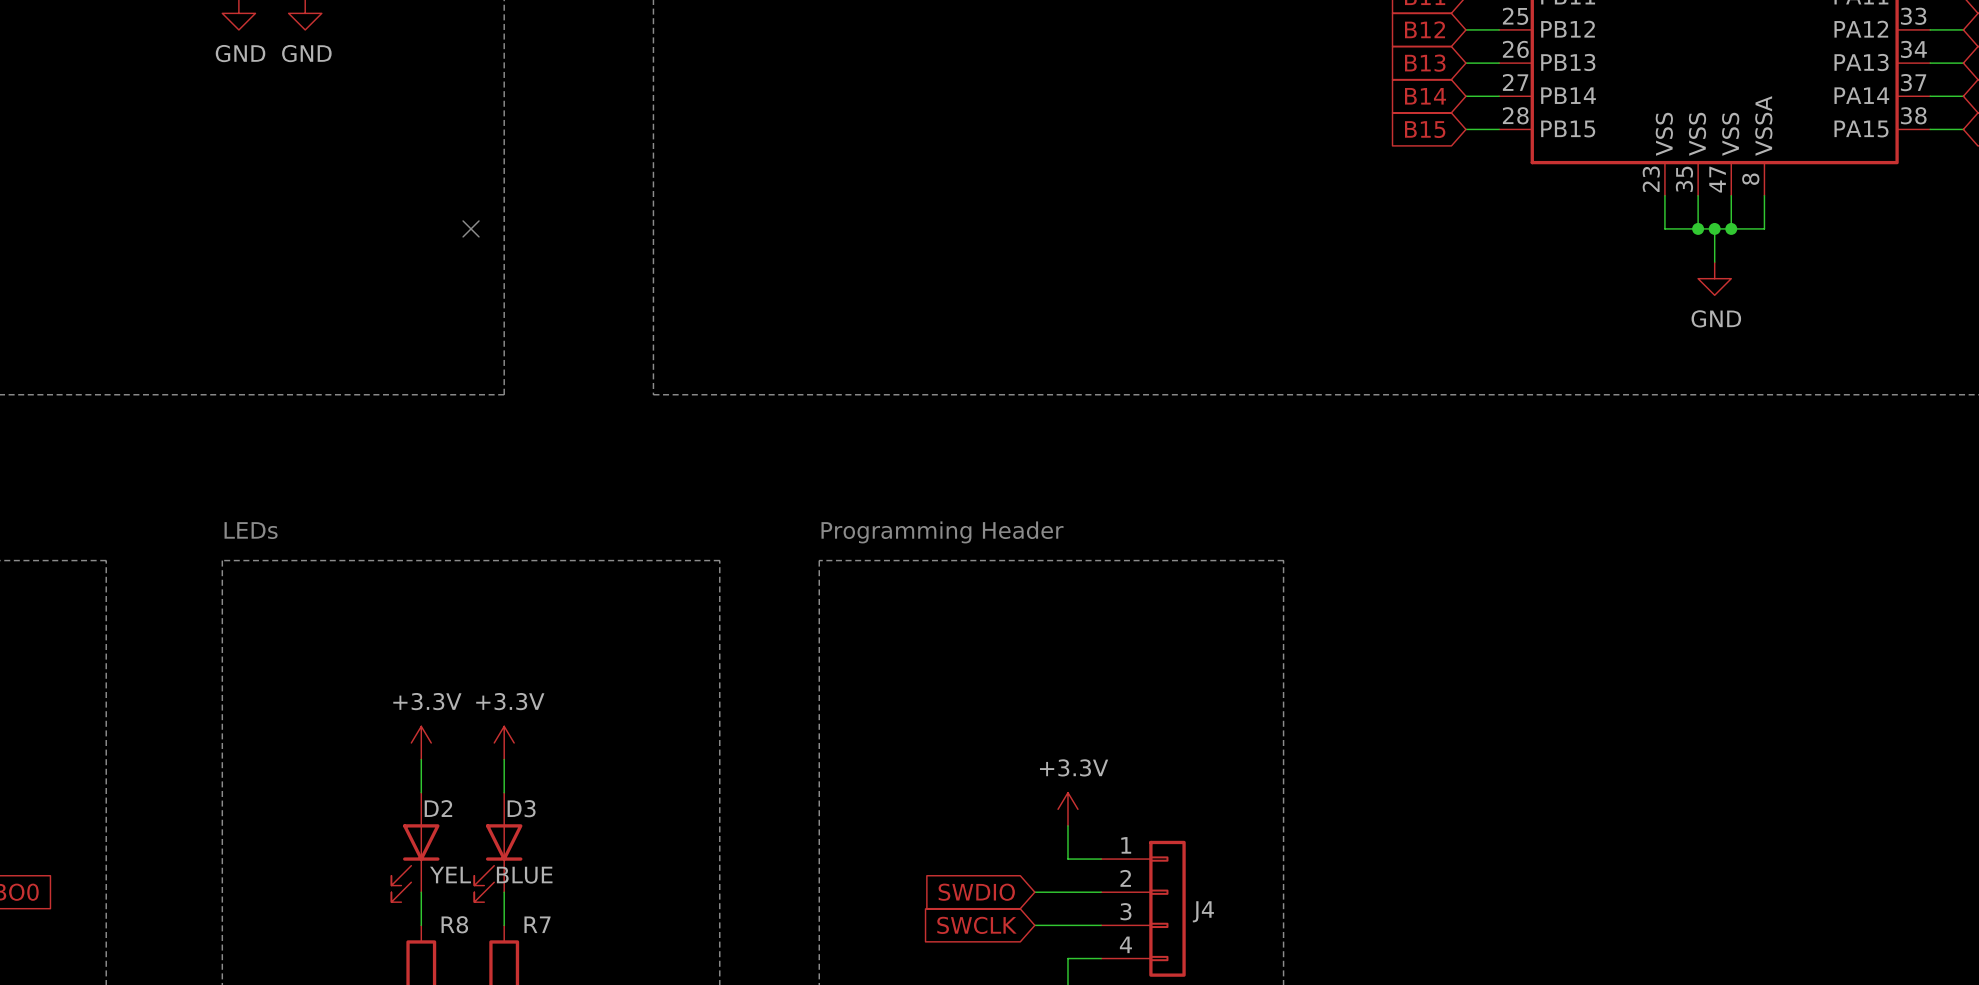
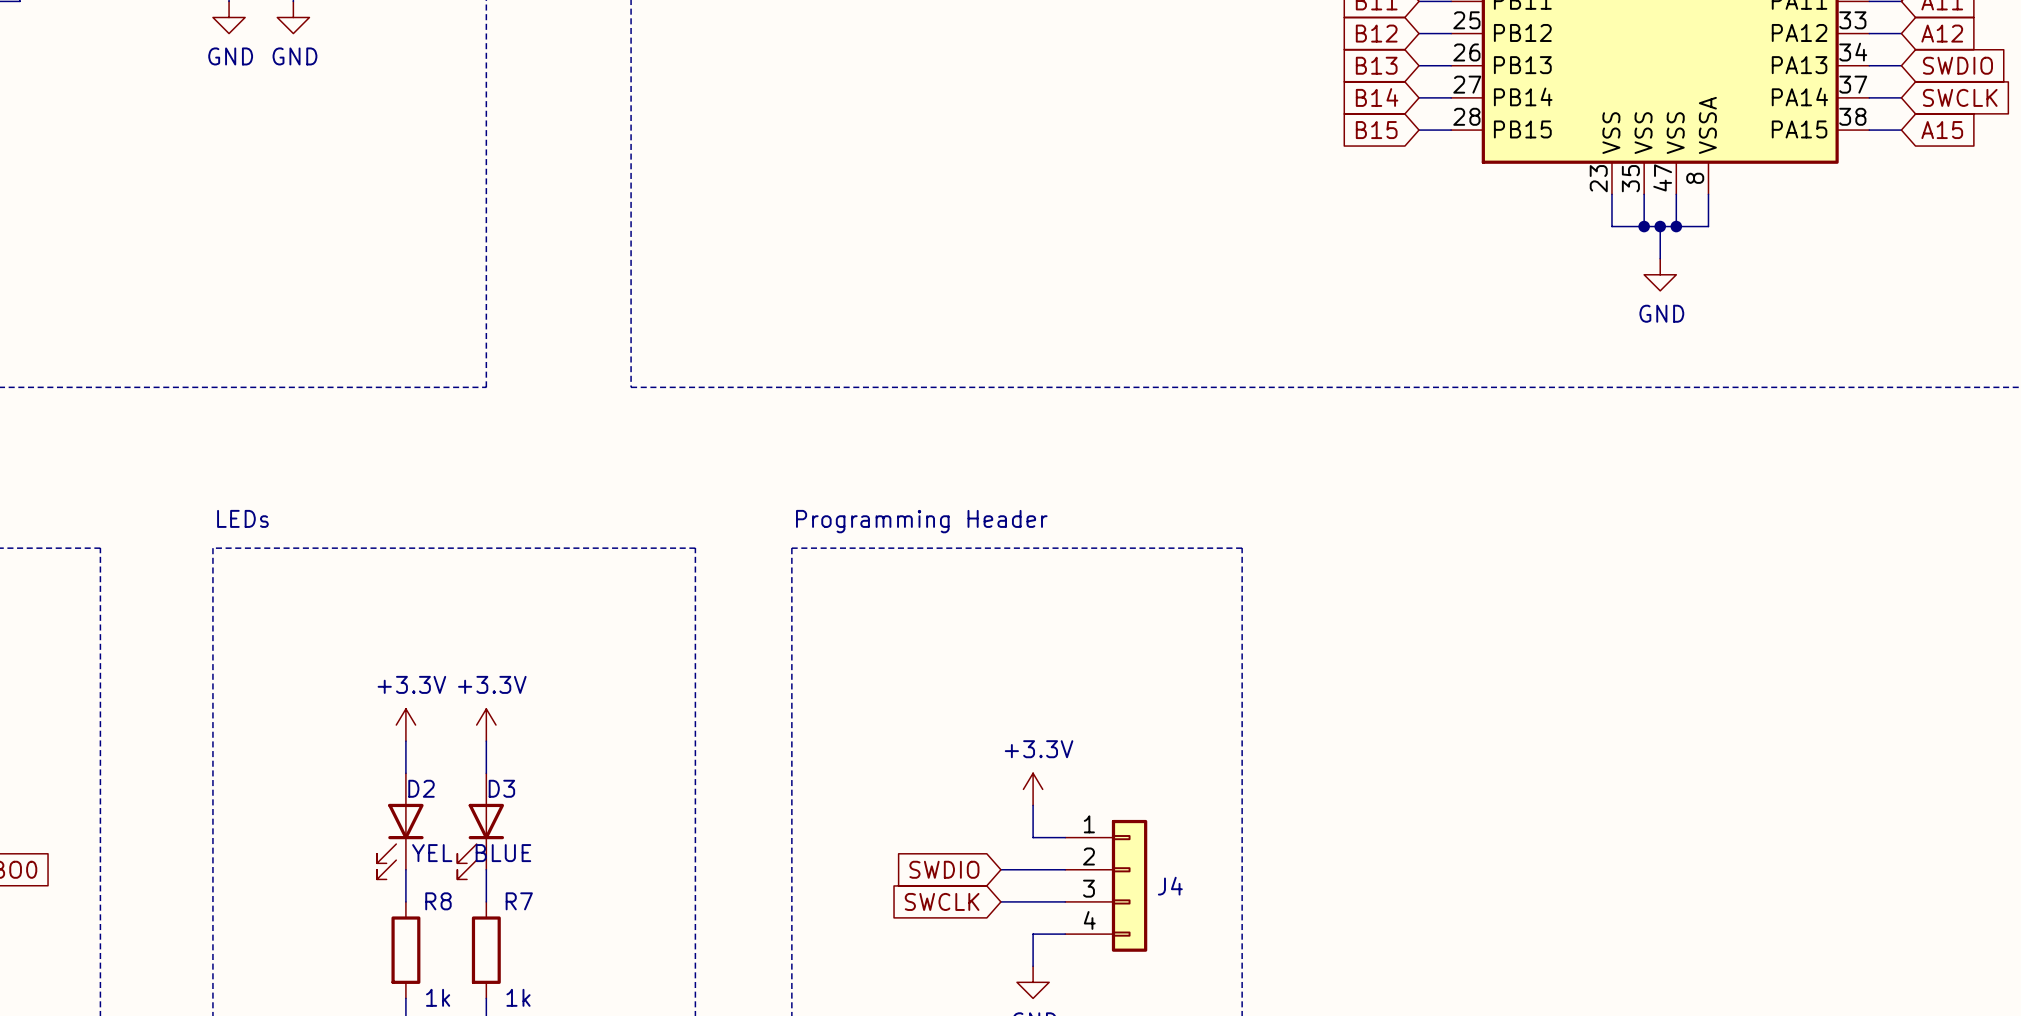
no-connect mark: (471, 228) -> none

